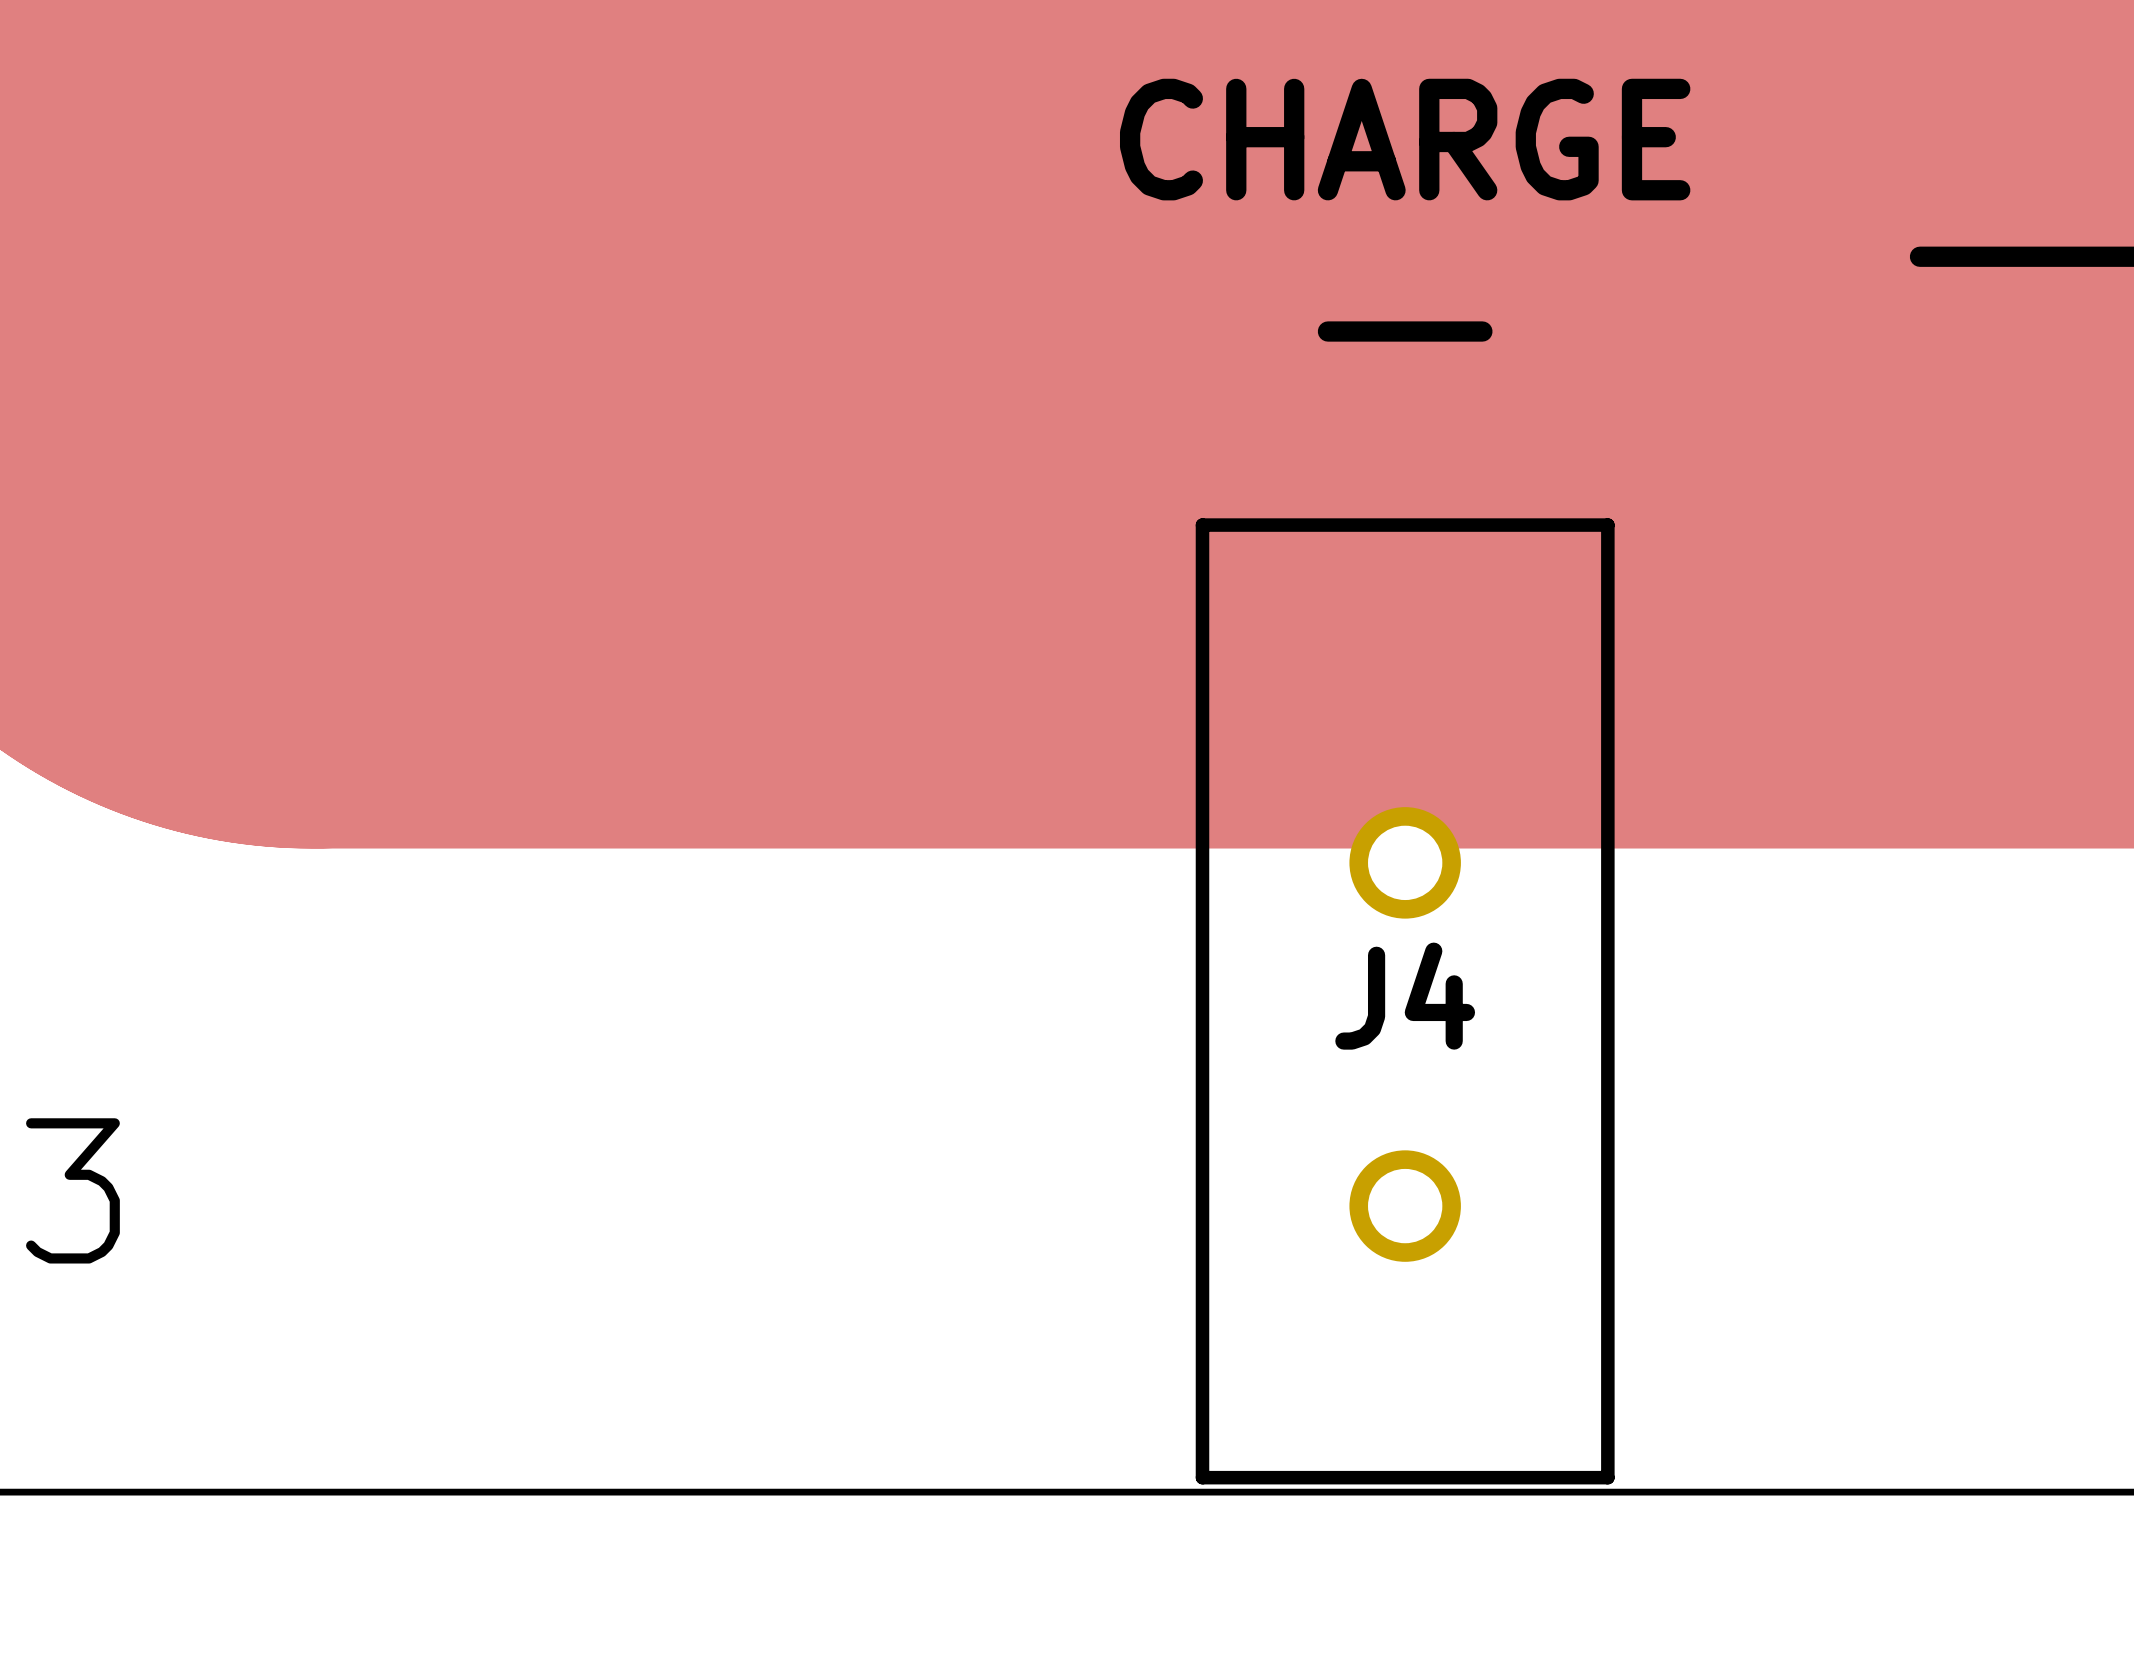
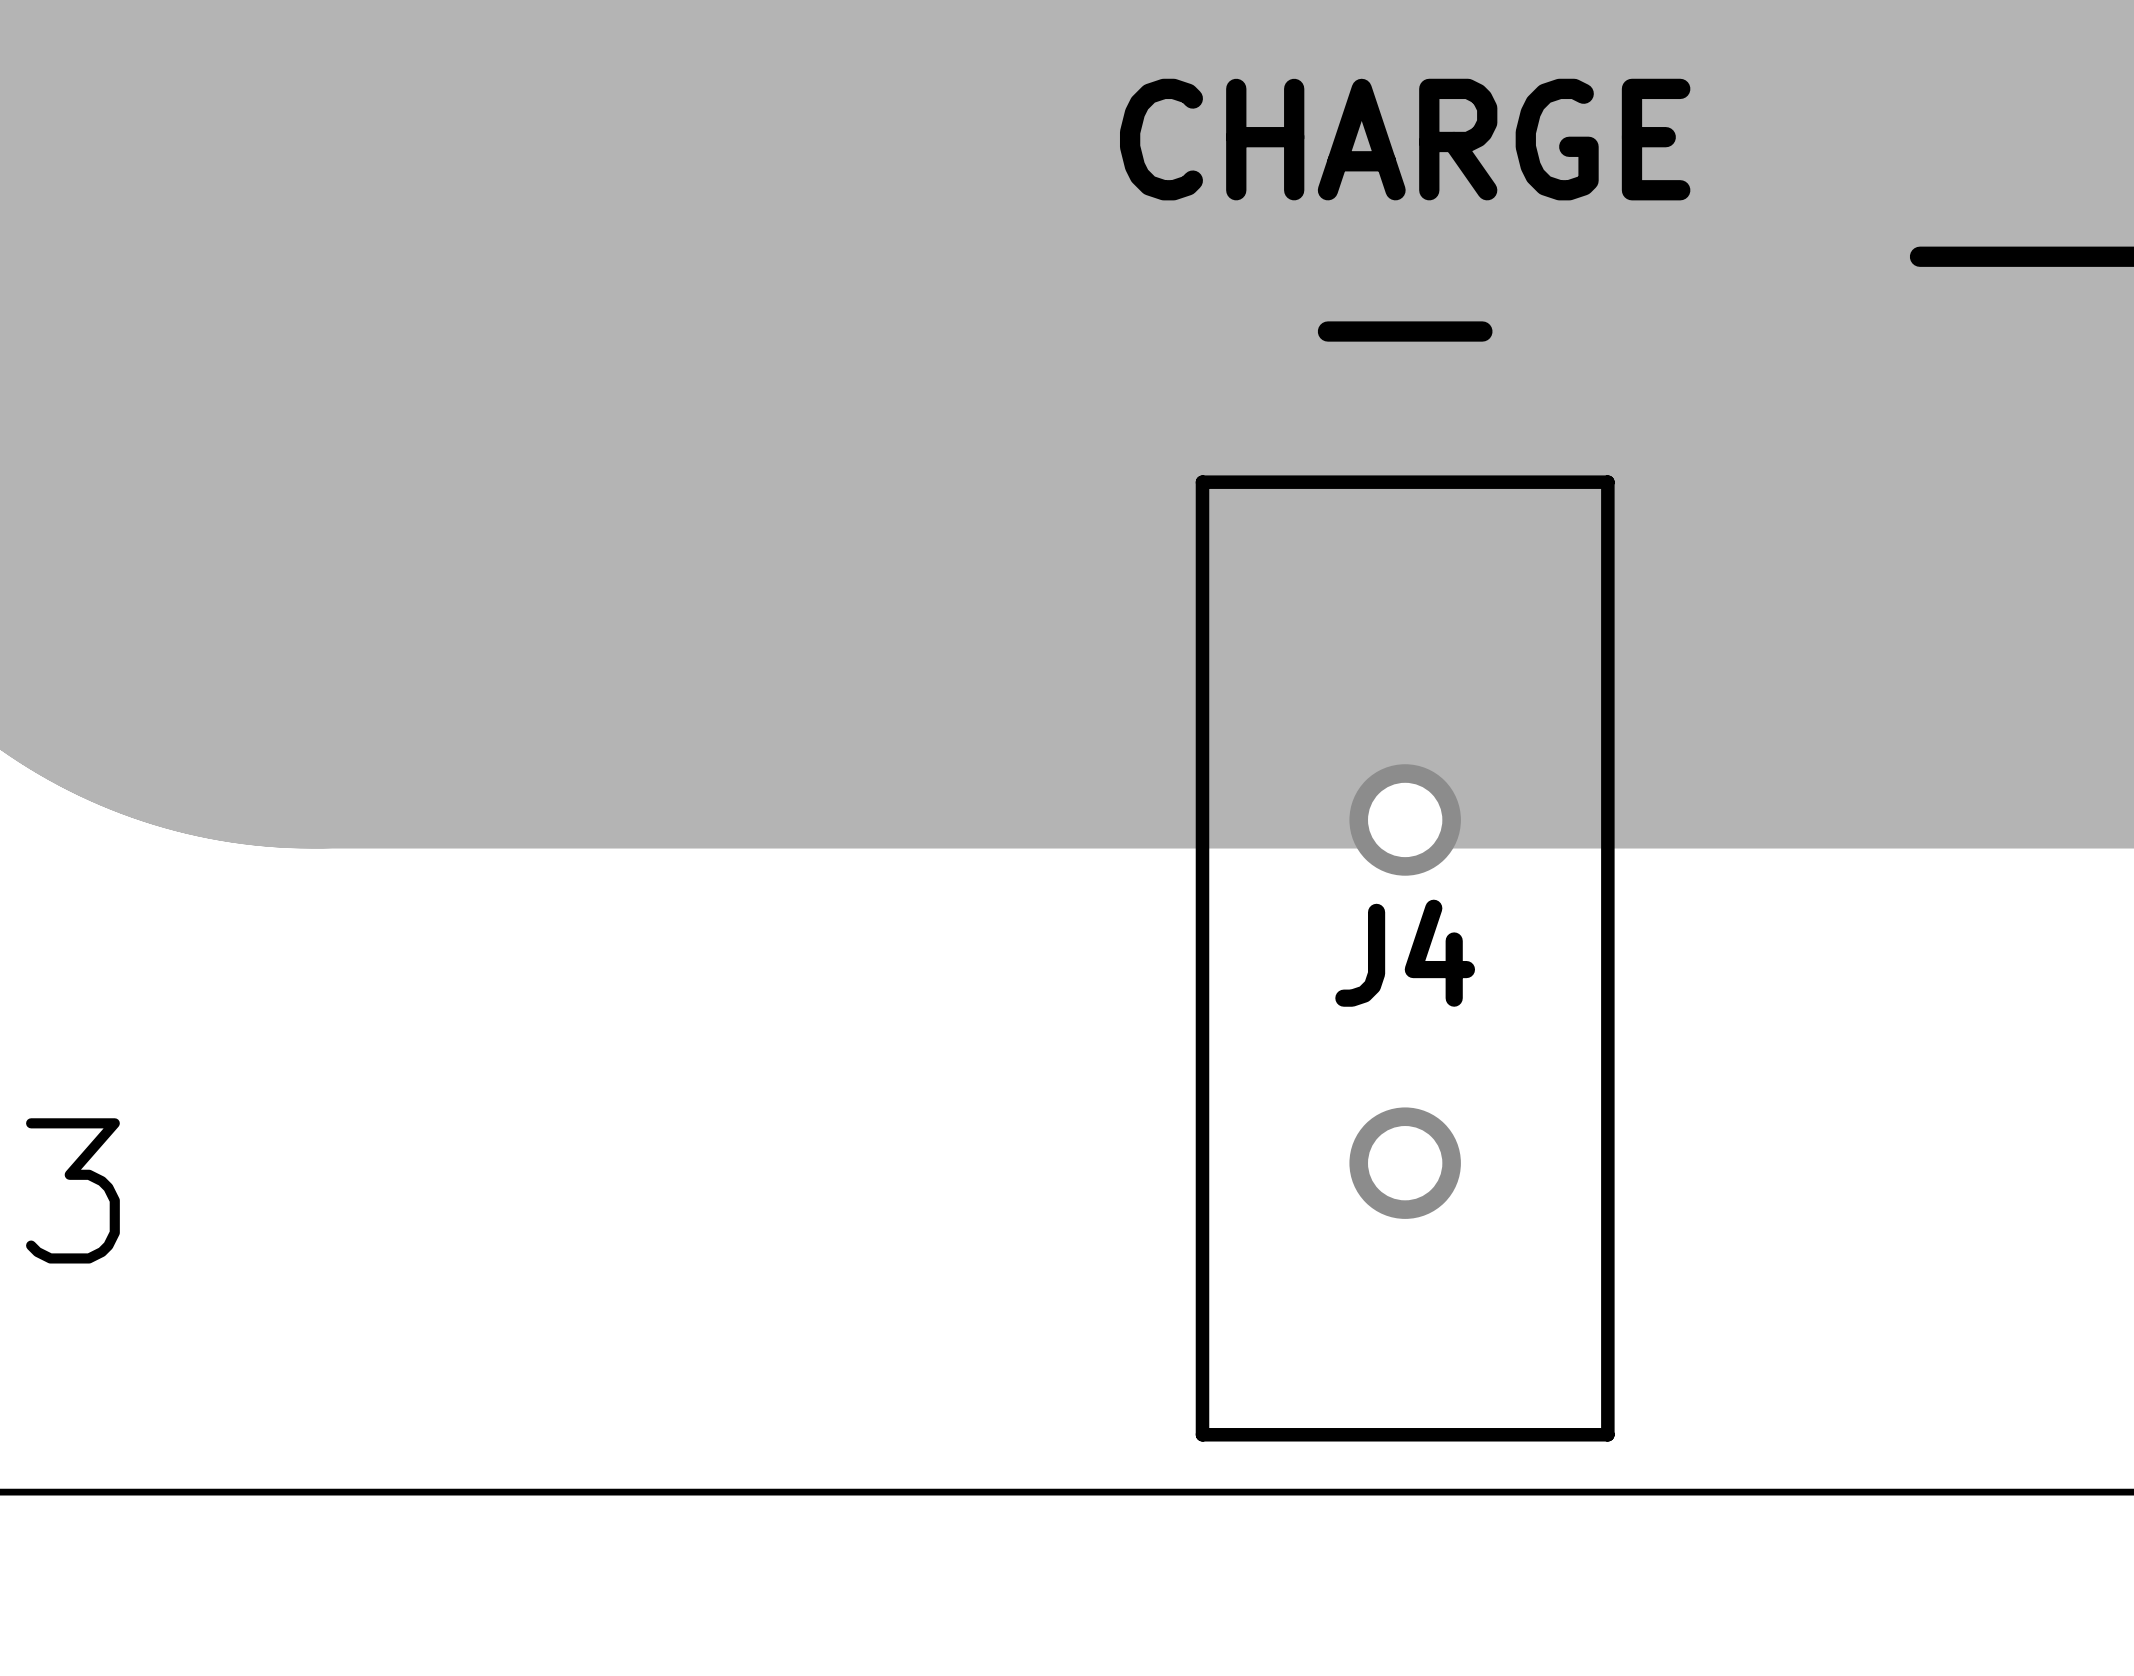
J4 position: (1405, 1001) -> (1405, 958)

